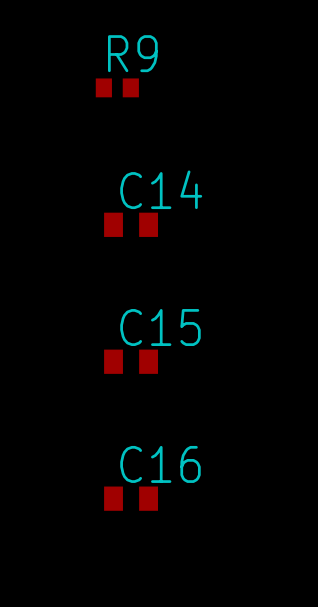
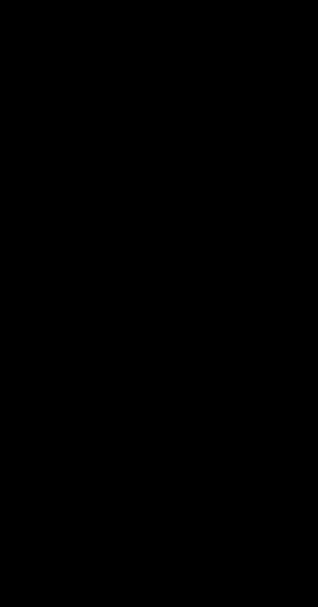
R9: (117, 87) -> none
C14: (131, 224) -> none
C15: (131, 361) -> none
C16: (131, 498) -> none

